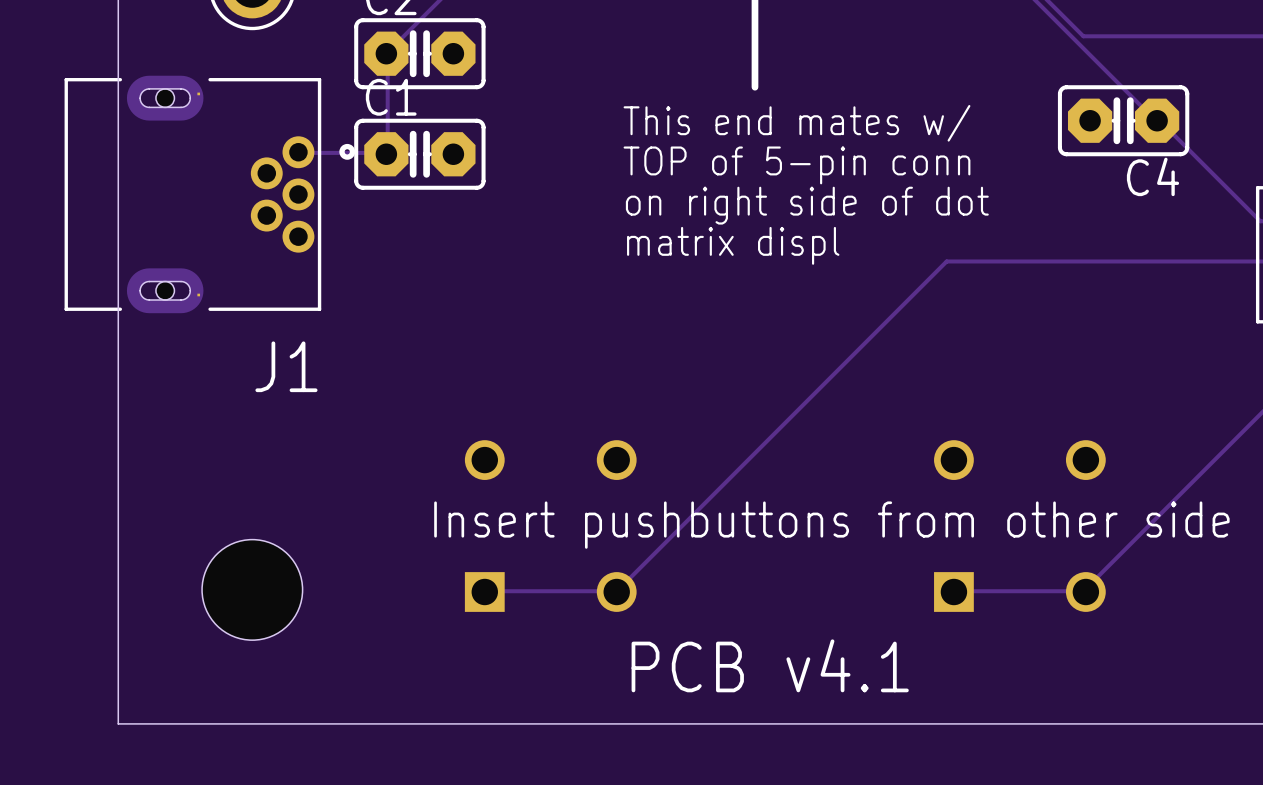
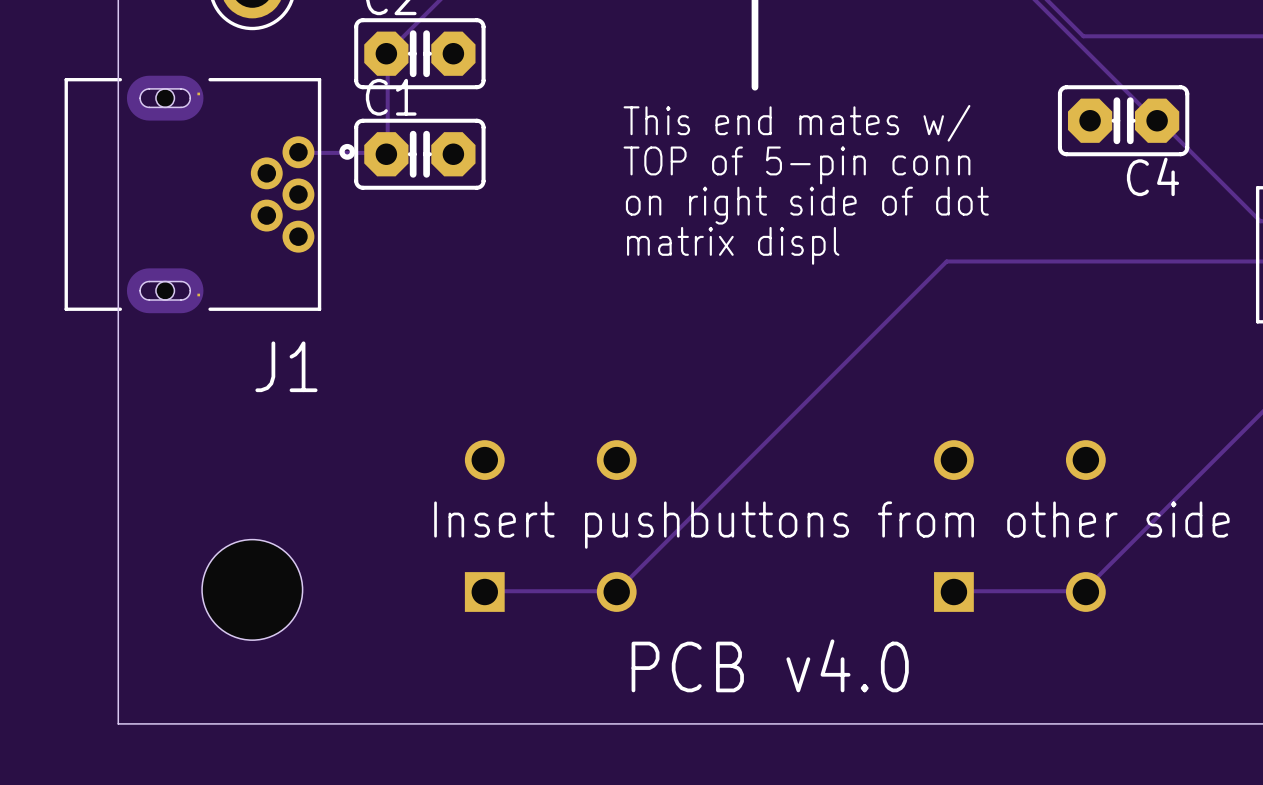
text: PCB v4.1 (770, 665) -> PCB v4.0 (770, 665)

